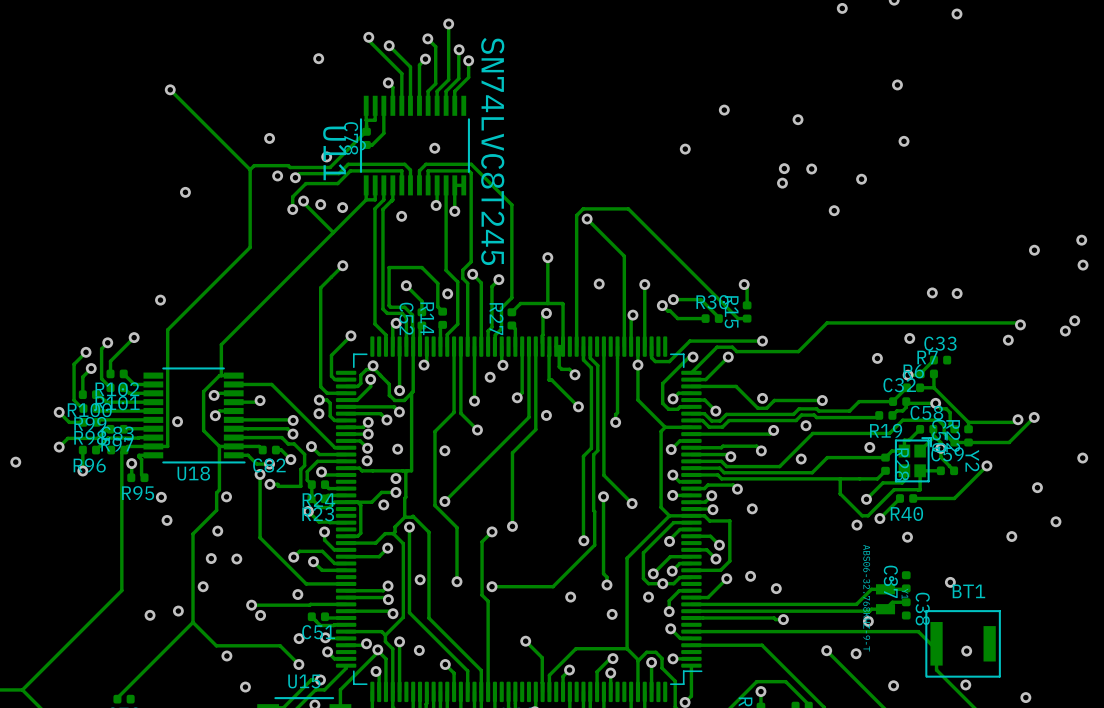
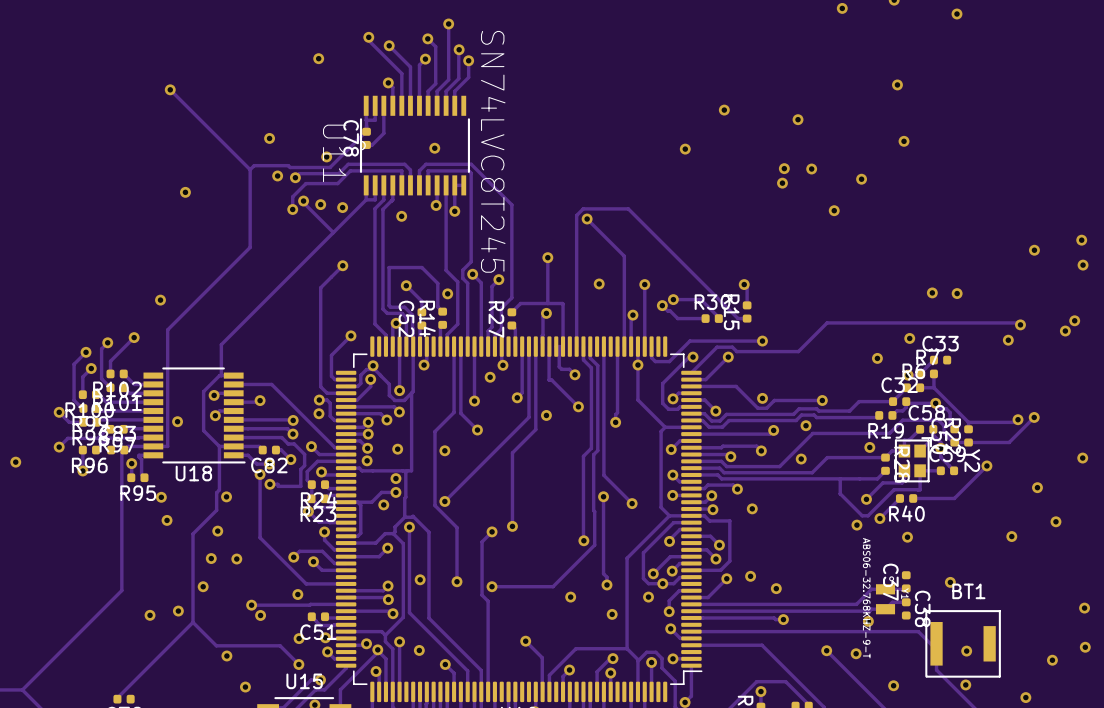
via: none -> (1084, 608)
via: none -> (1085, 647)
via: none -> (1052, 660)

